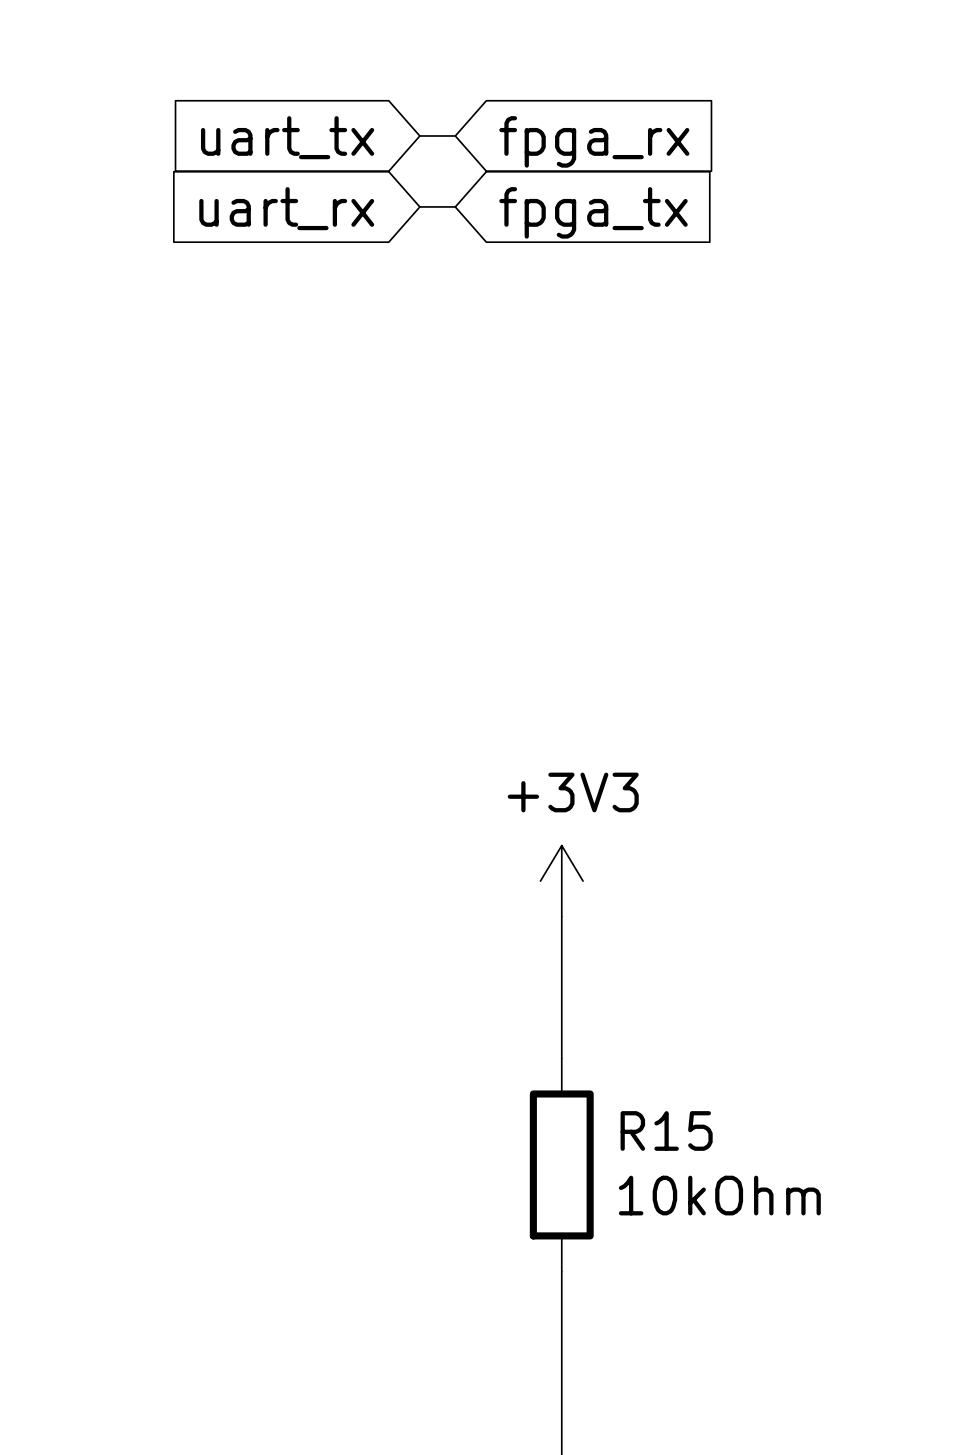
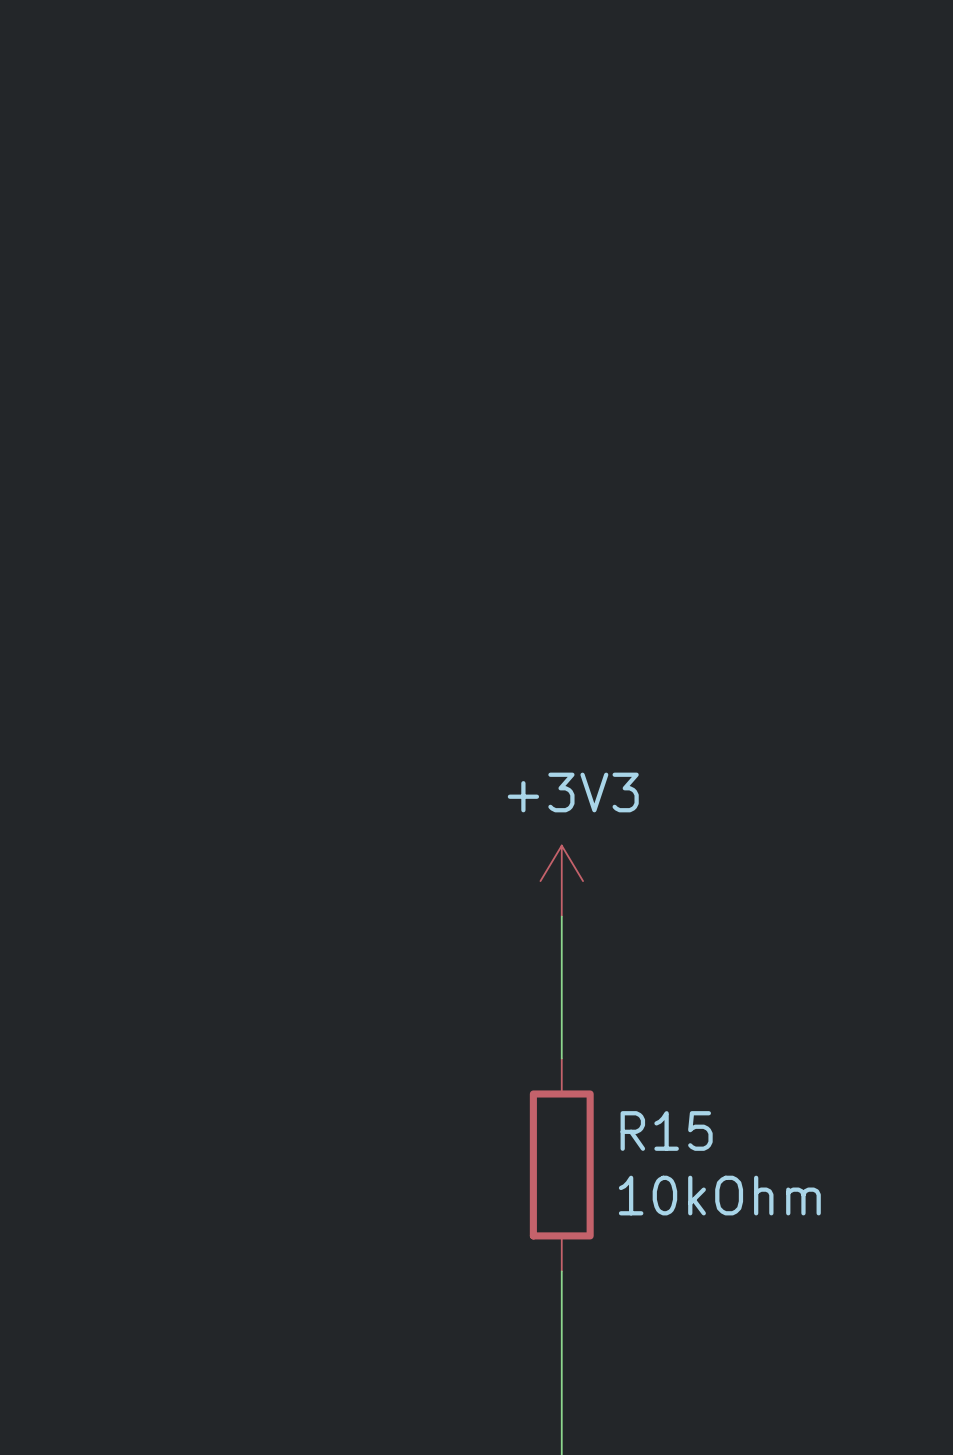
wire: (419, 135) (455, 135) -> none
global label: uart_tx (287, 137) -> none
global label: fpga_rx (594, 141) -> none
wire: (419, 206) (455, 206) -> none
global label: uart_rx (286, 208) -> none
global label: fpga_tx (593, 212) -> none

